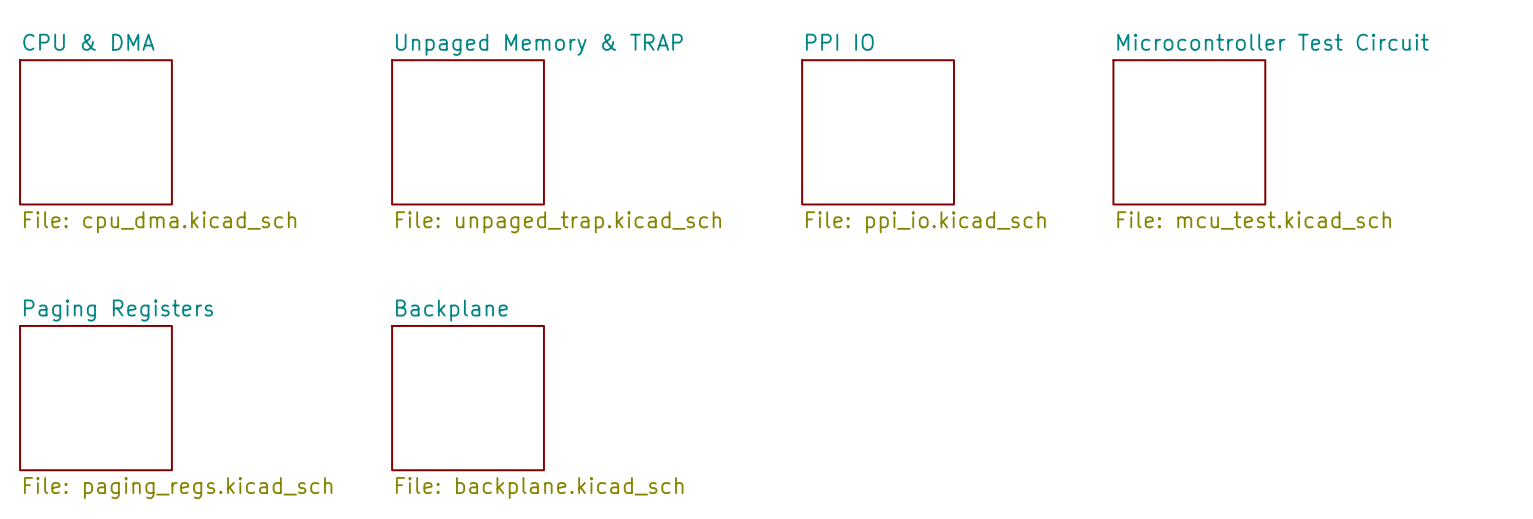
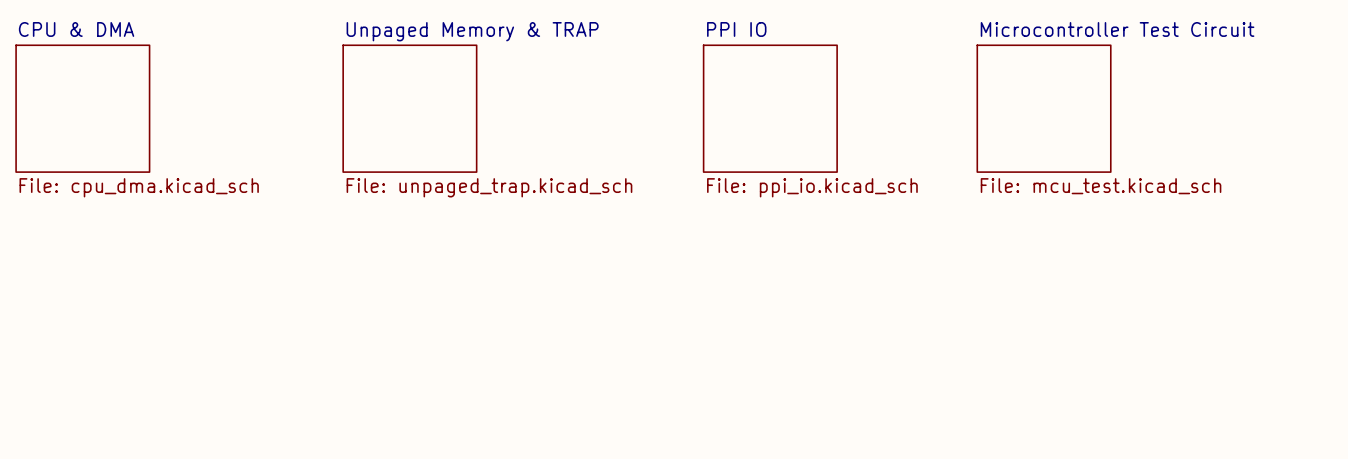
sheet Paging Registers: File: paging_regs.kicad_sch (95, 398) -> none
sheet Backplane: File: backplane.kicad_sch (468, 398) -> none

